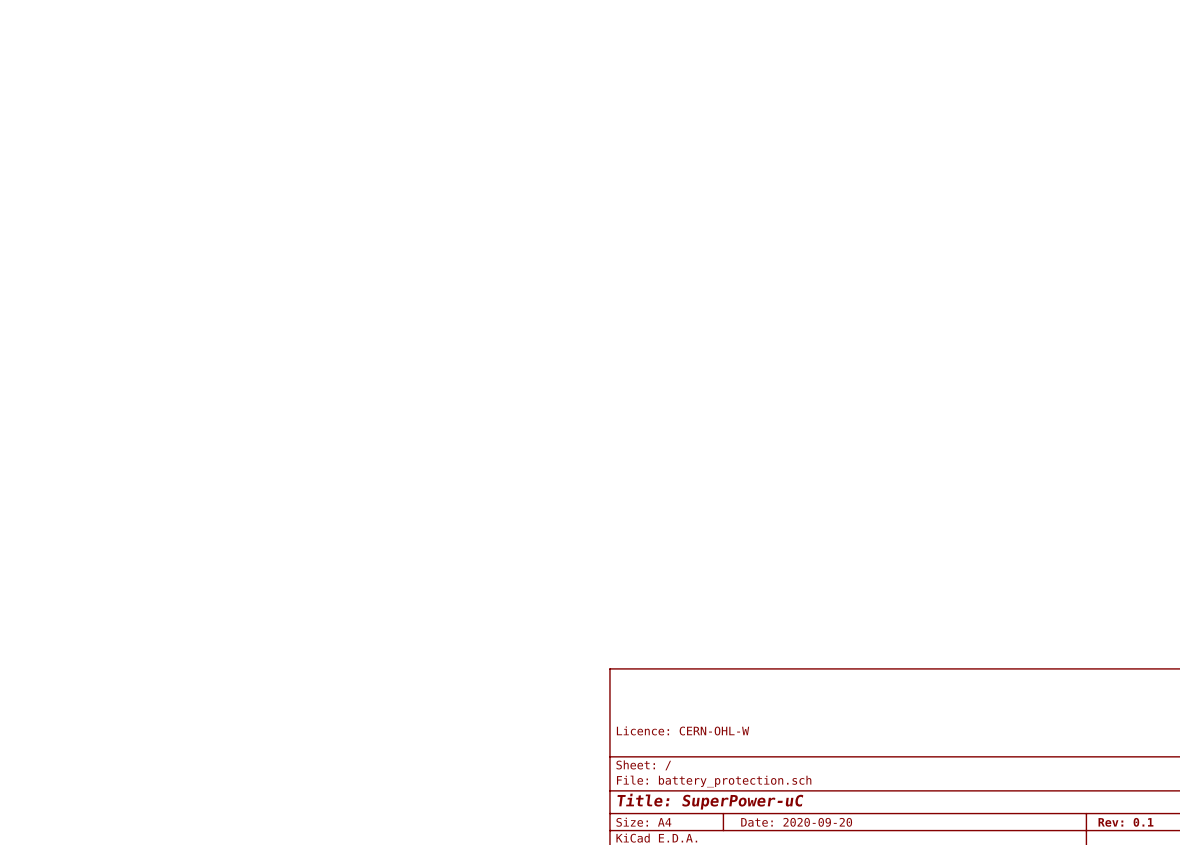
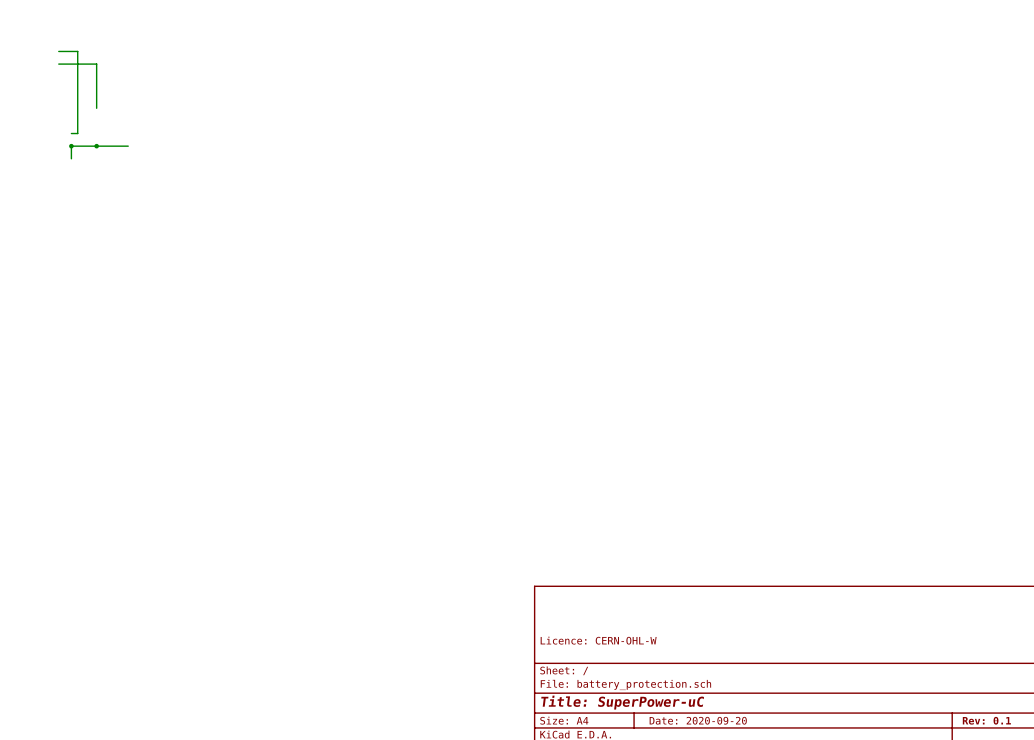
wire: none -> (58, 51) (77, 51) (77, 133) (71, 133)
wire: none -> (58, 64) (96, 64) (96, 108)
junction: none -> (71, 146)
junction: none -> (96, 146)
wire: none -> (128, 146) (71, 146) (71, 158)

